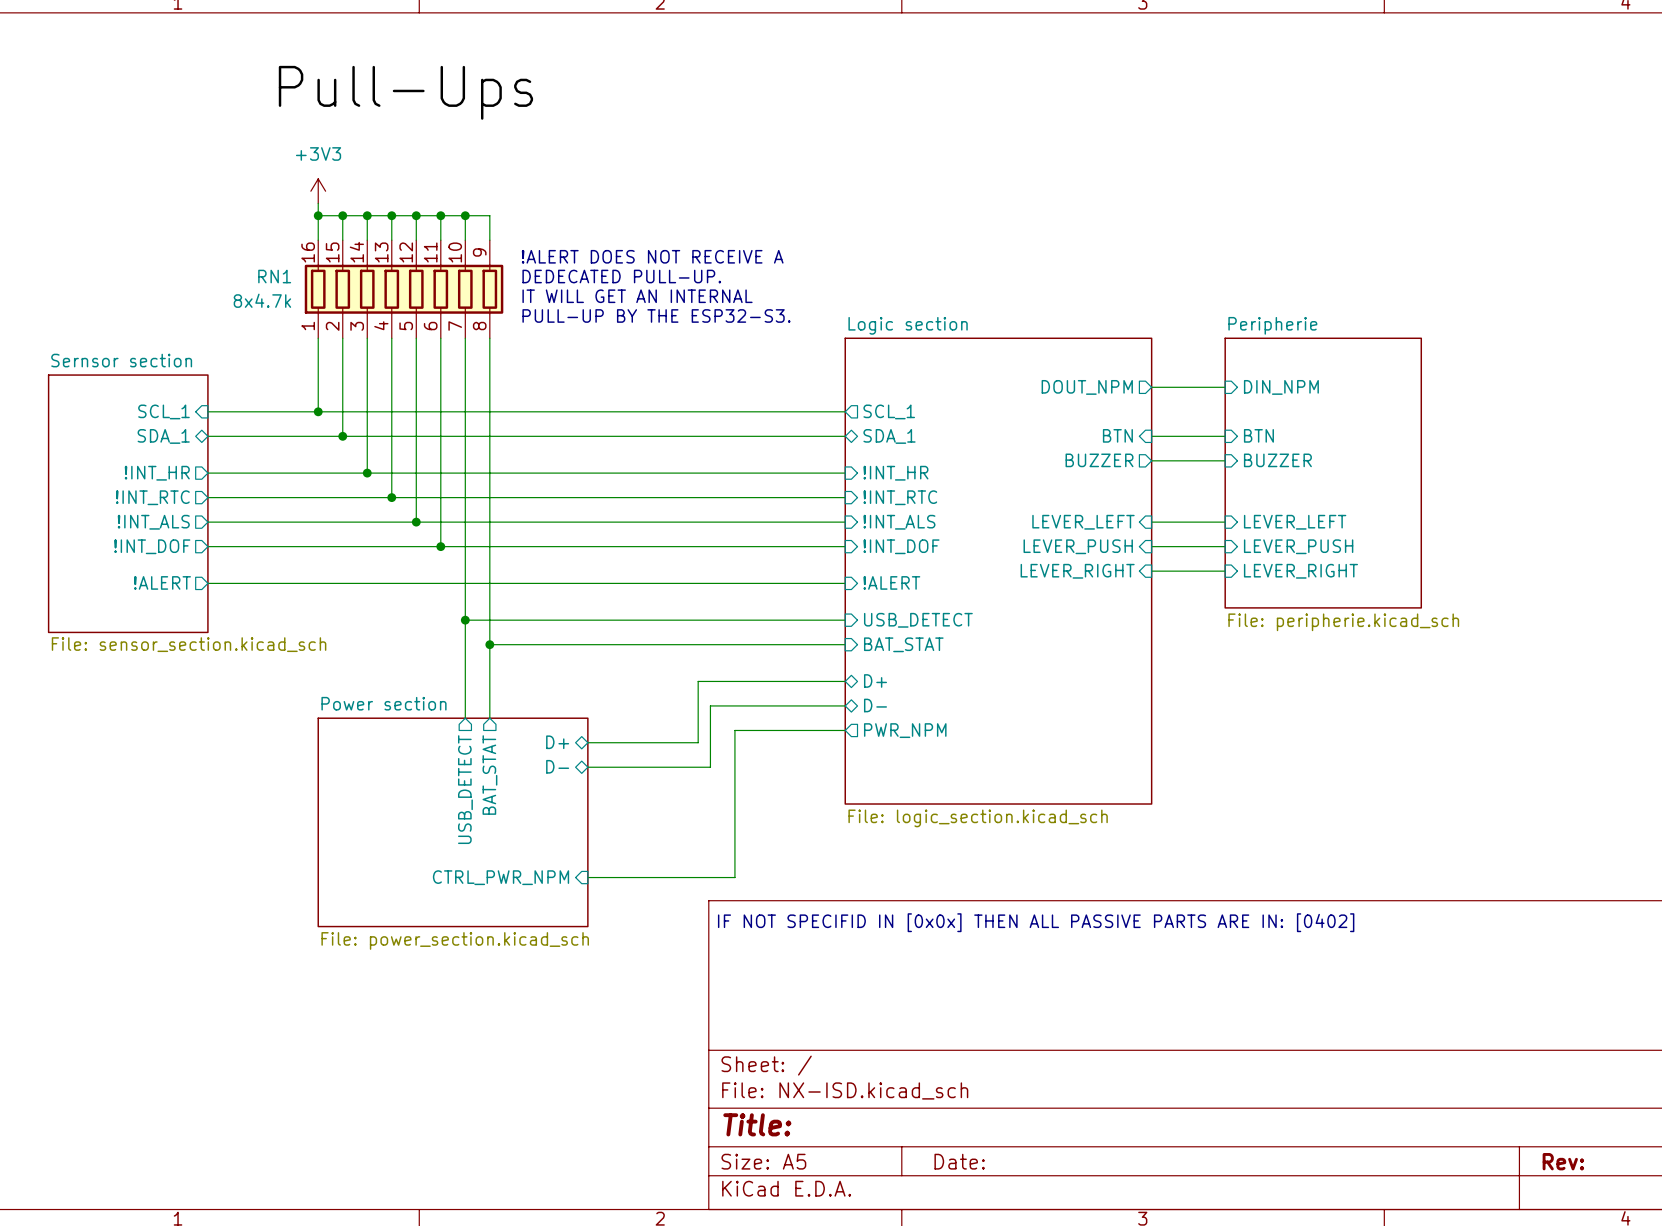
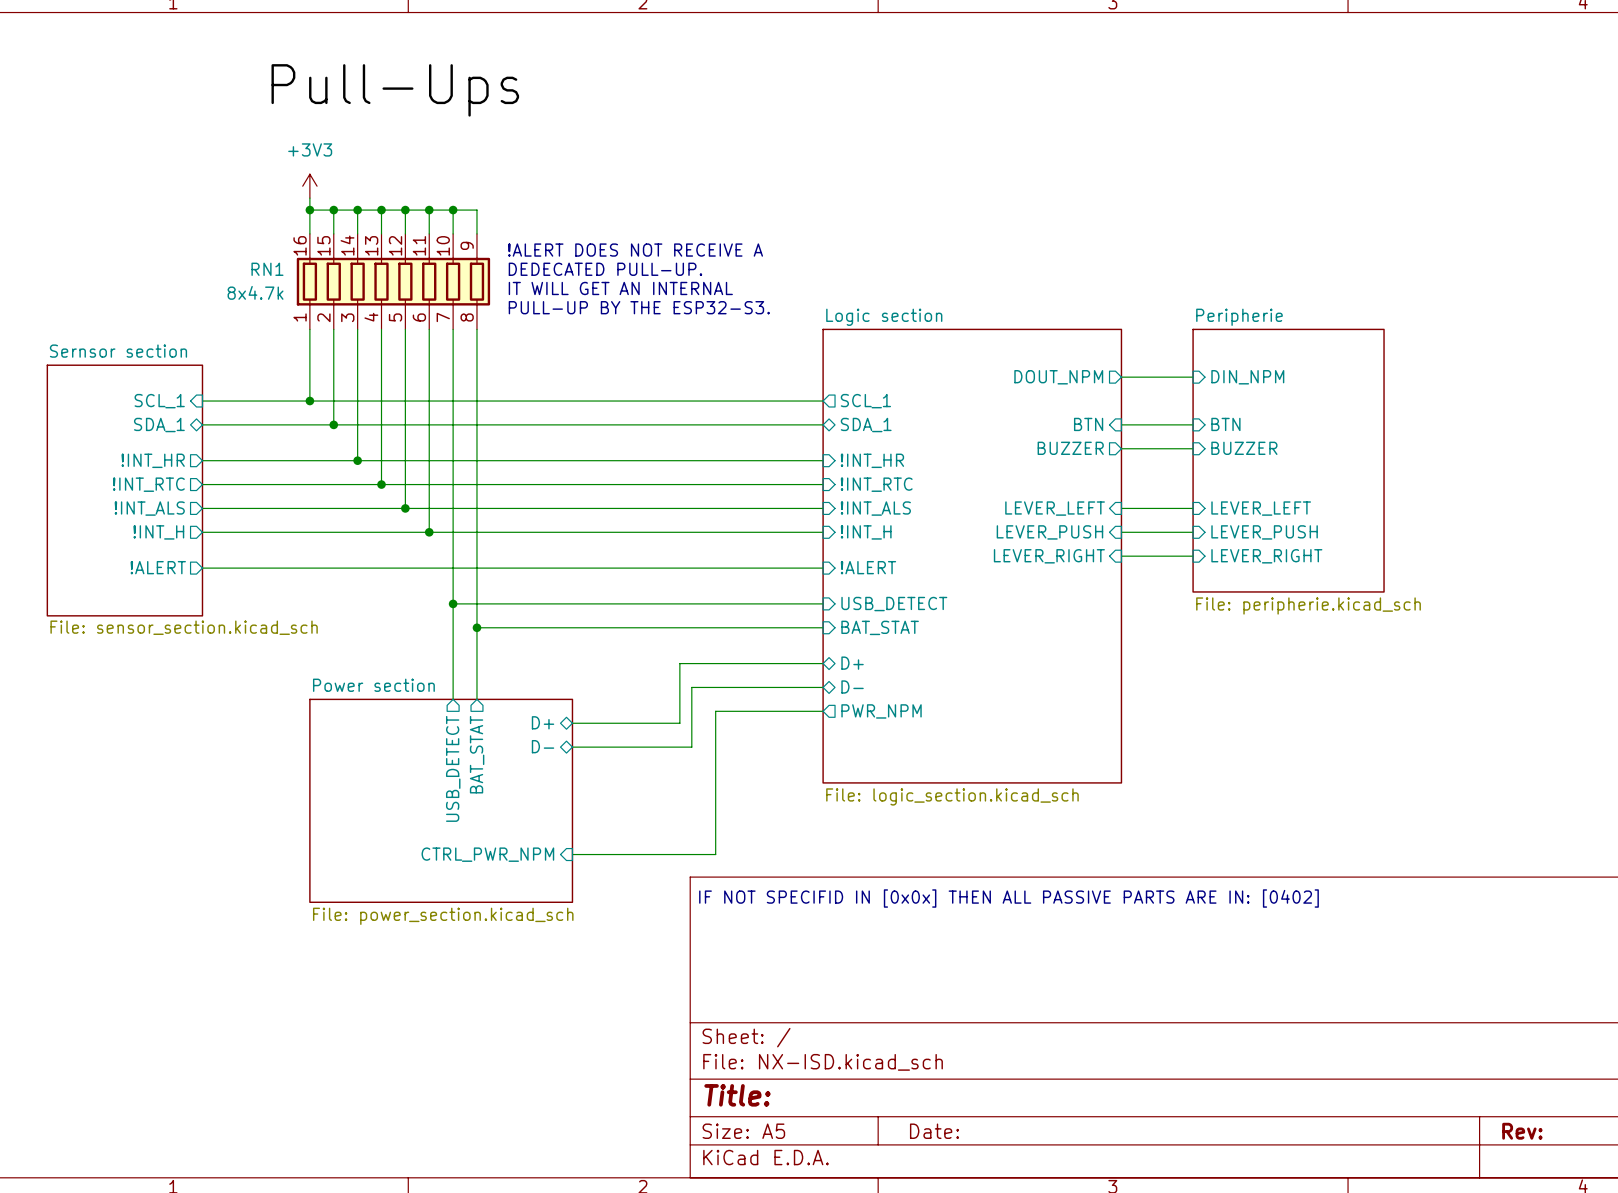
sheet pin: !INT_DOF (152, 546) -> !INT_H (158, 532)
sheet pin: !INT_DOF (901, 546) -> !INT_H (866, 532)

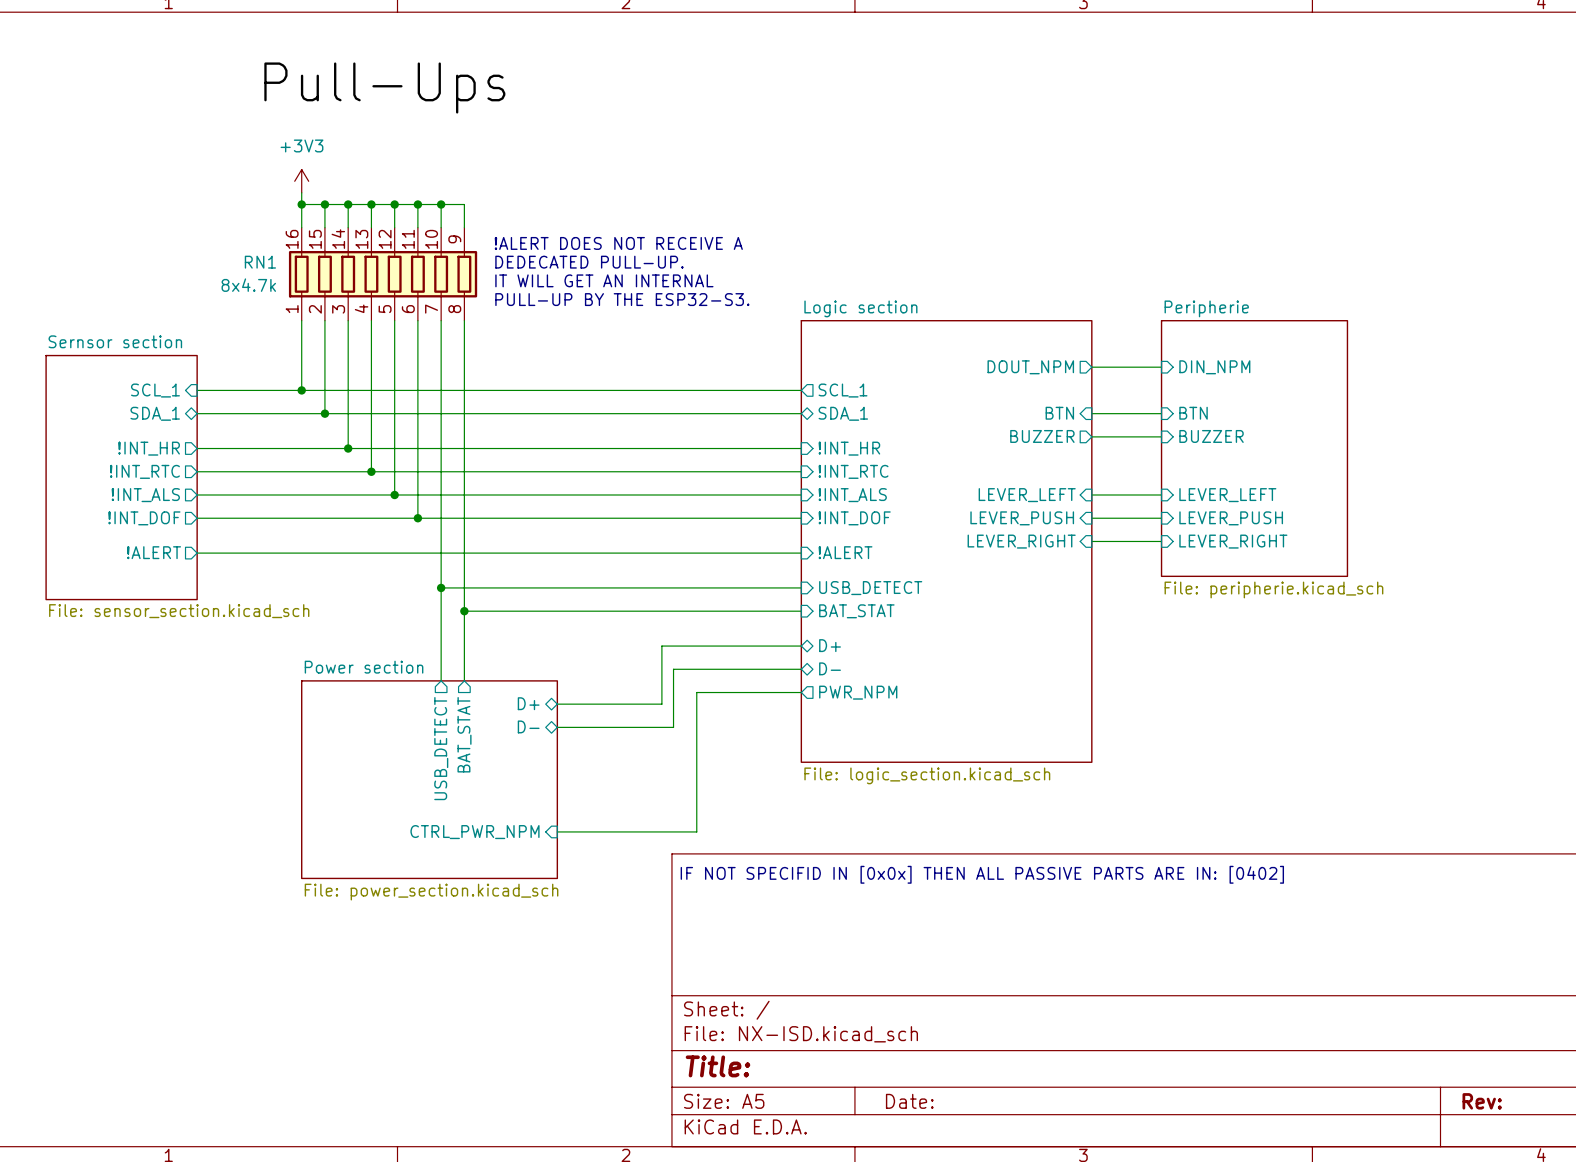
sheet pin: !INT_H (158, 532) -> !INT_DOF (144, 518)
sheet pin: !INT_H (866, 532) -> !INT_DOF (854, 518)

